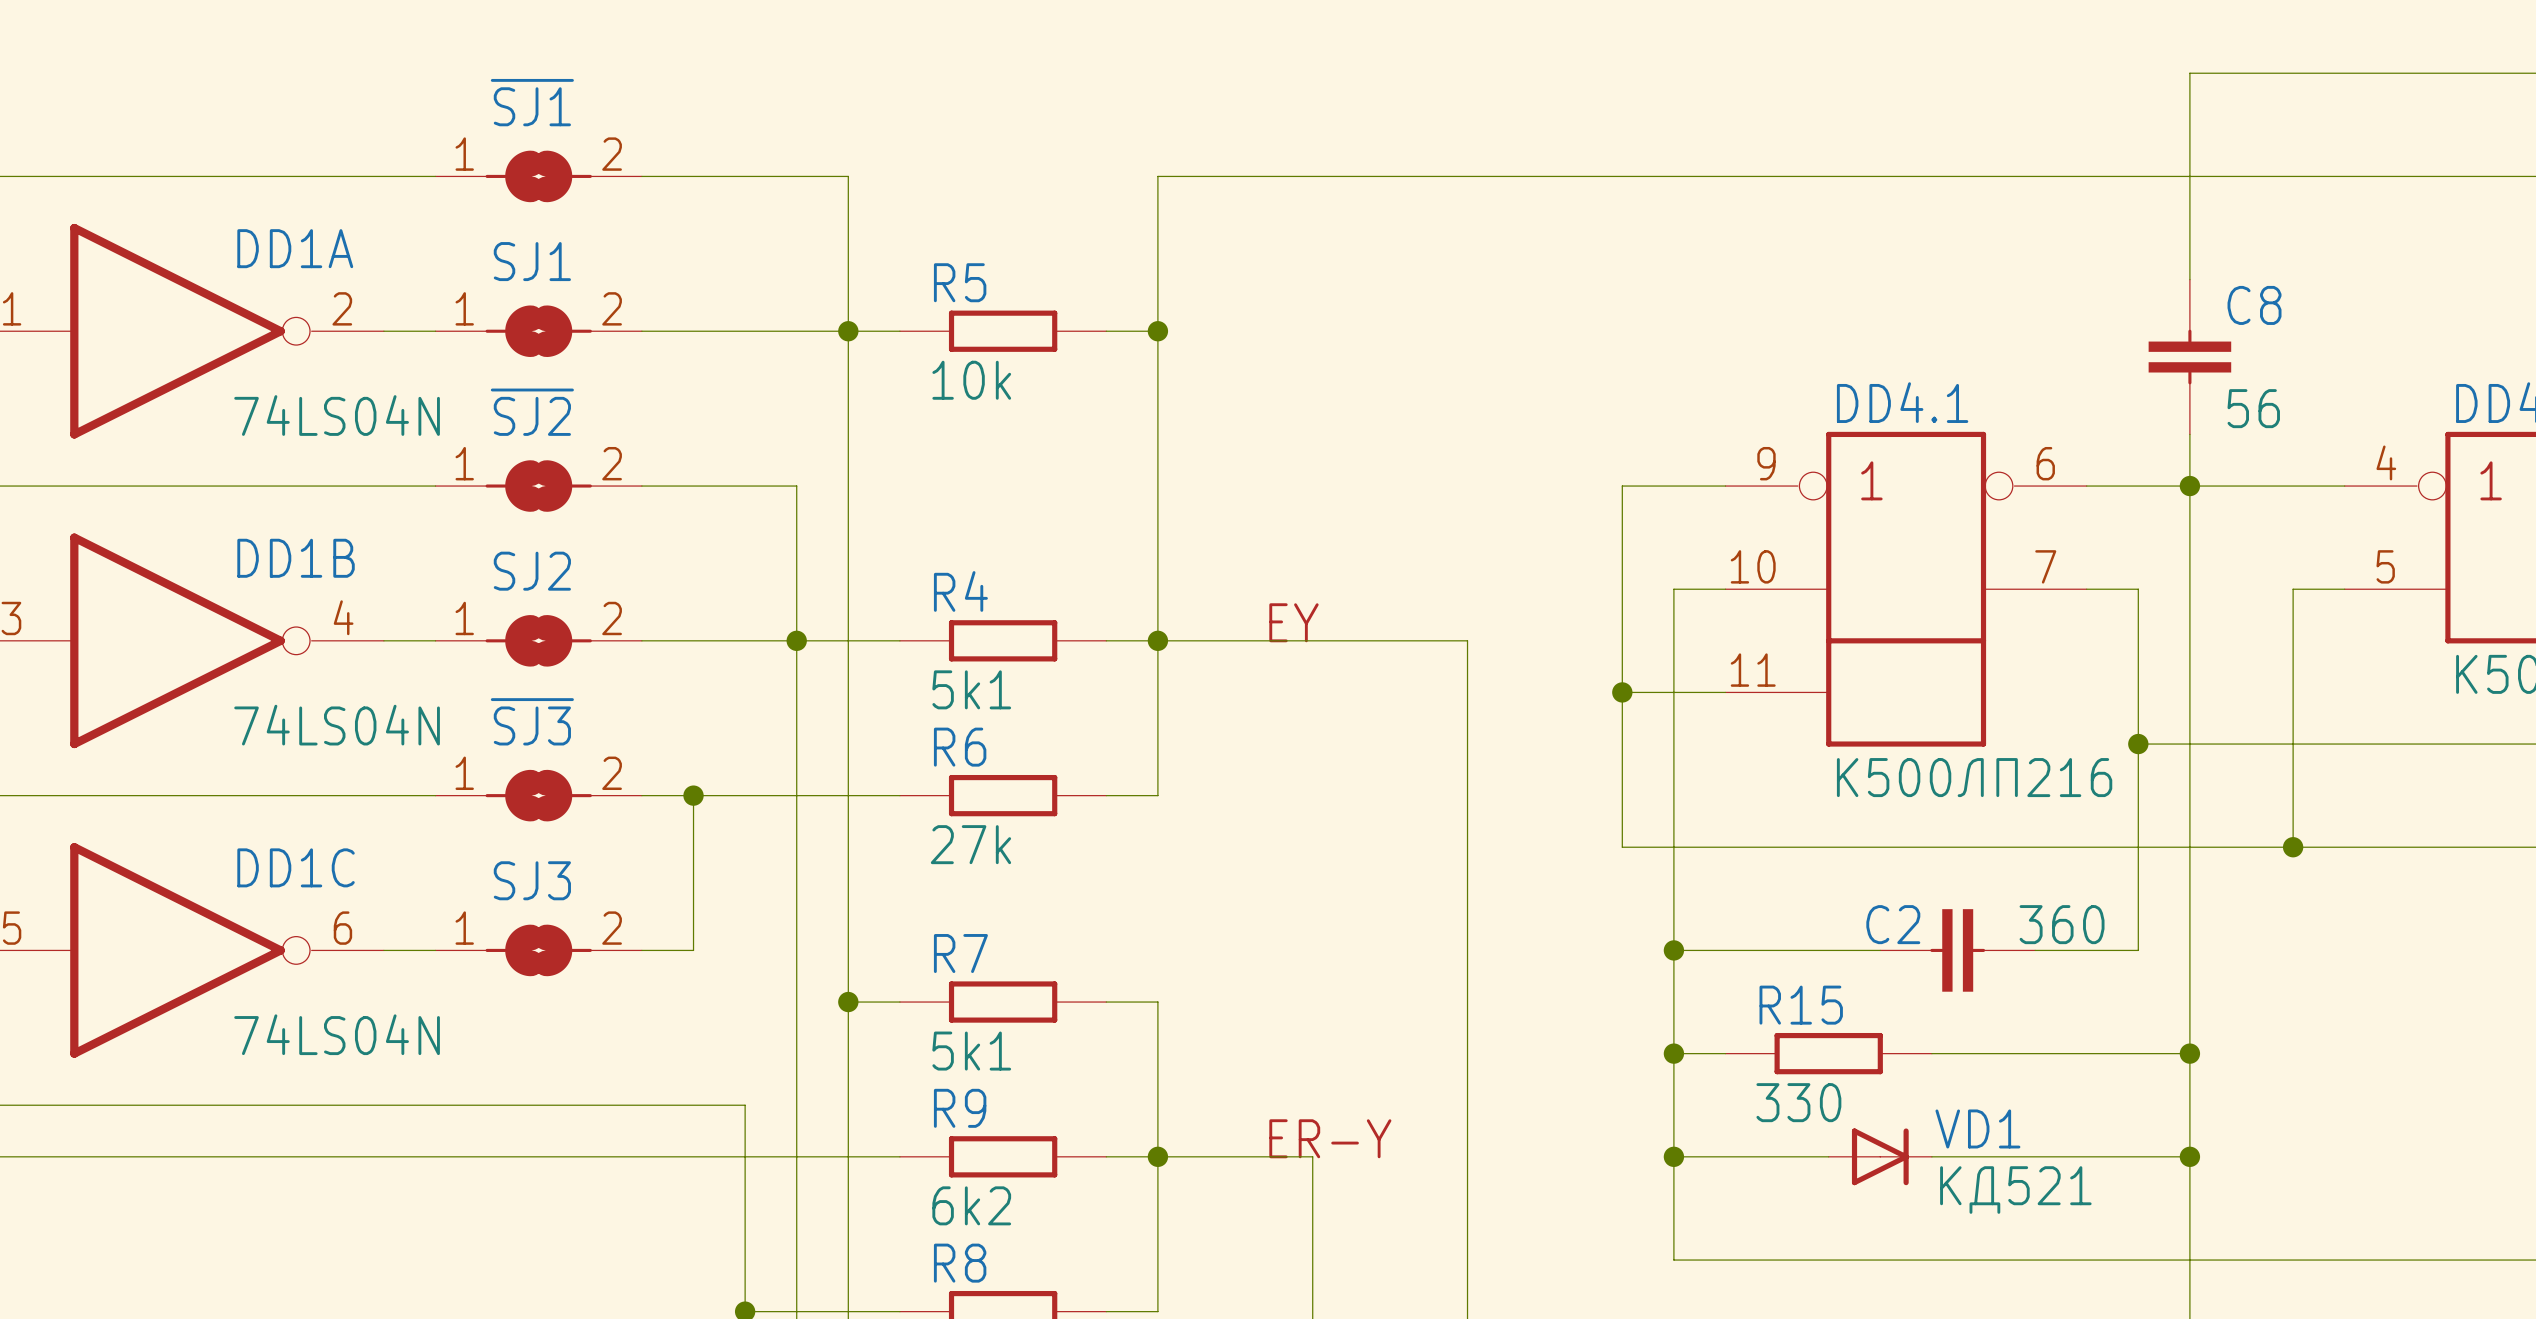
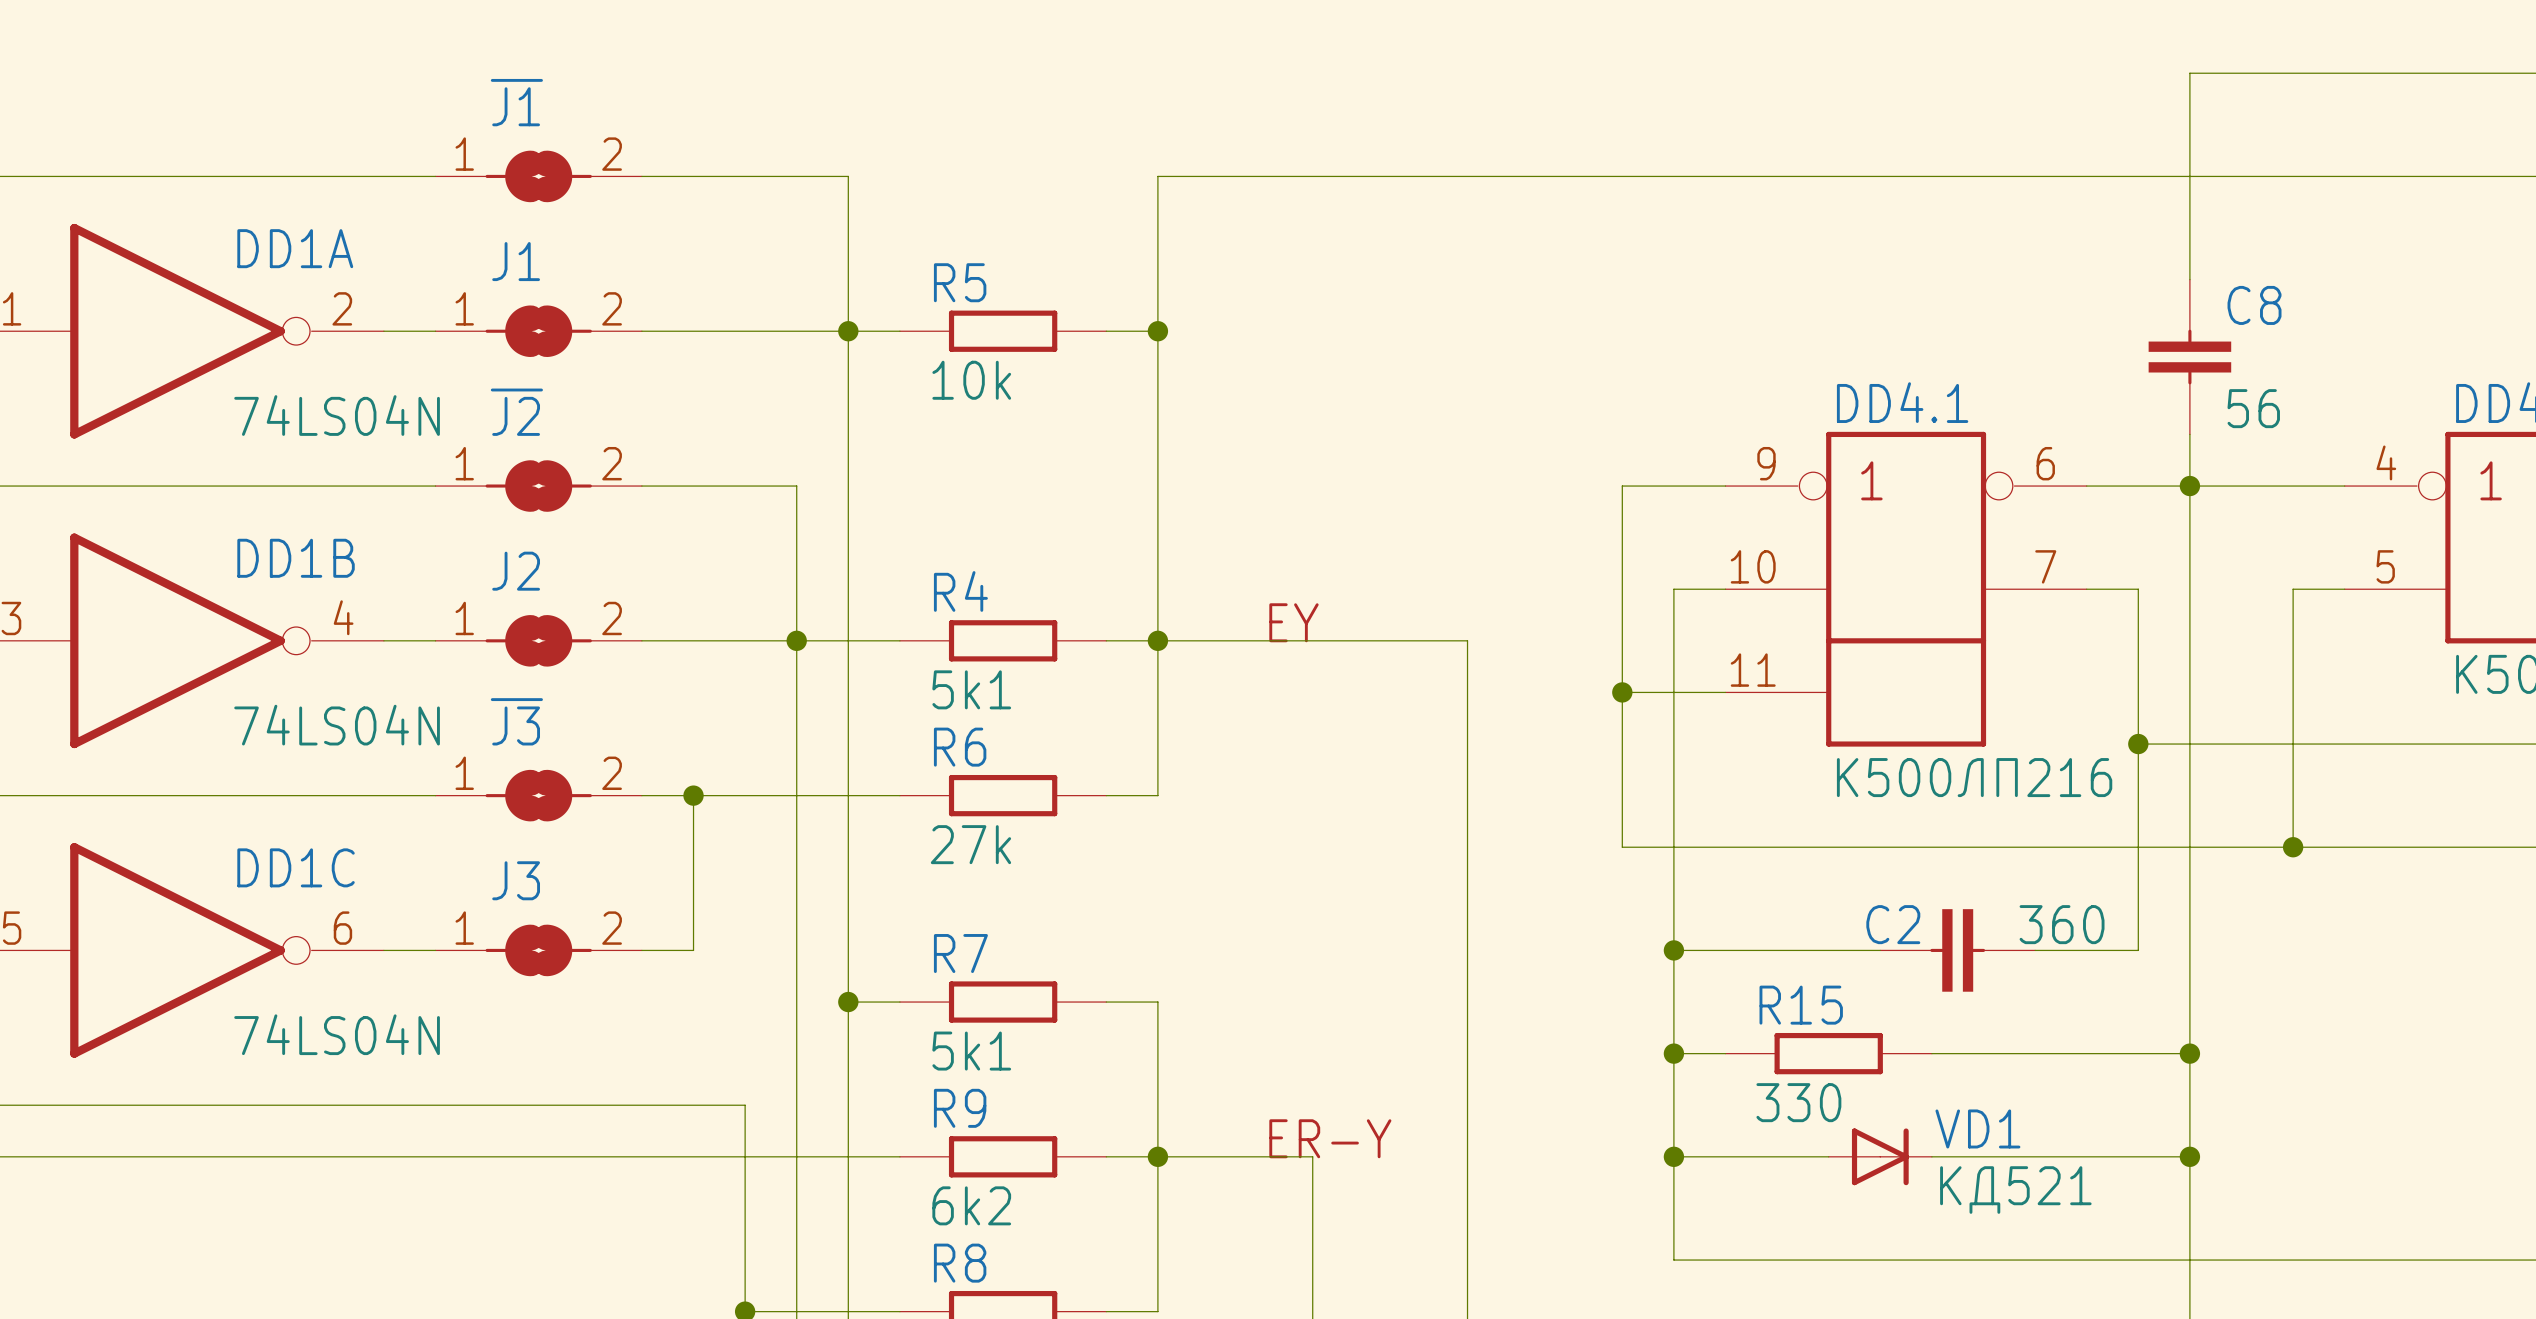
~{SJ1} name: ~{SJ1} (532, 102) -> ~{J1} (516, 102)
SJ1 name: SJ1 (532, 261) -> J1 (516, 261)
~{SJ2} name: ~{SJ2} (532, 412) -> ~{J2} (516, 412)
SJ2 name: SJ2 (532, 571) -> J2 (516, 571)
~{SJ3} name: ~{SJ3} (532, 721) -> ~{J3} (516, 721)
SJ3 name: SJ3 (532, 880) -> J3 (516, 880)

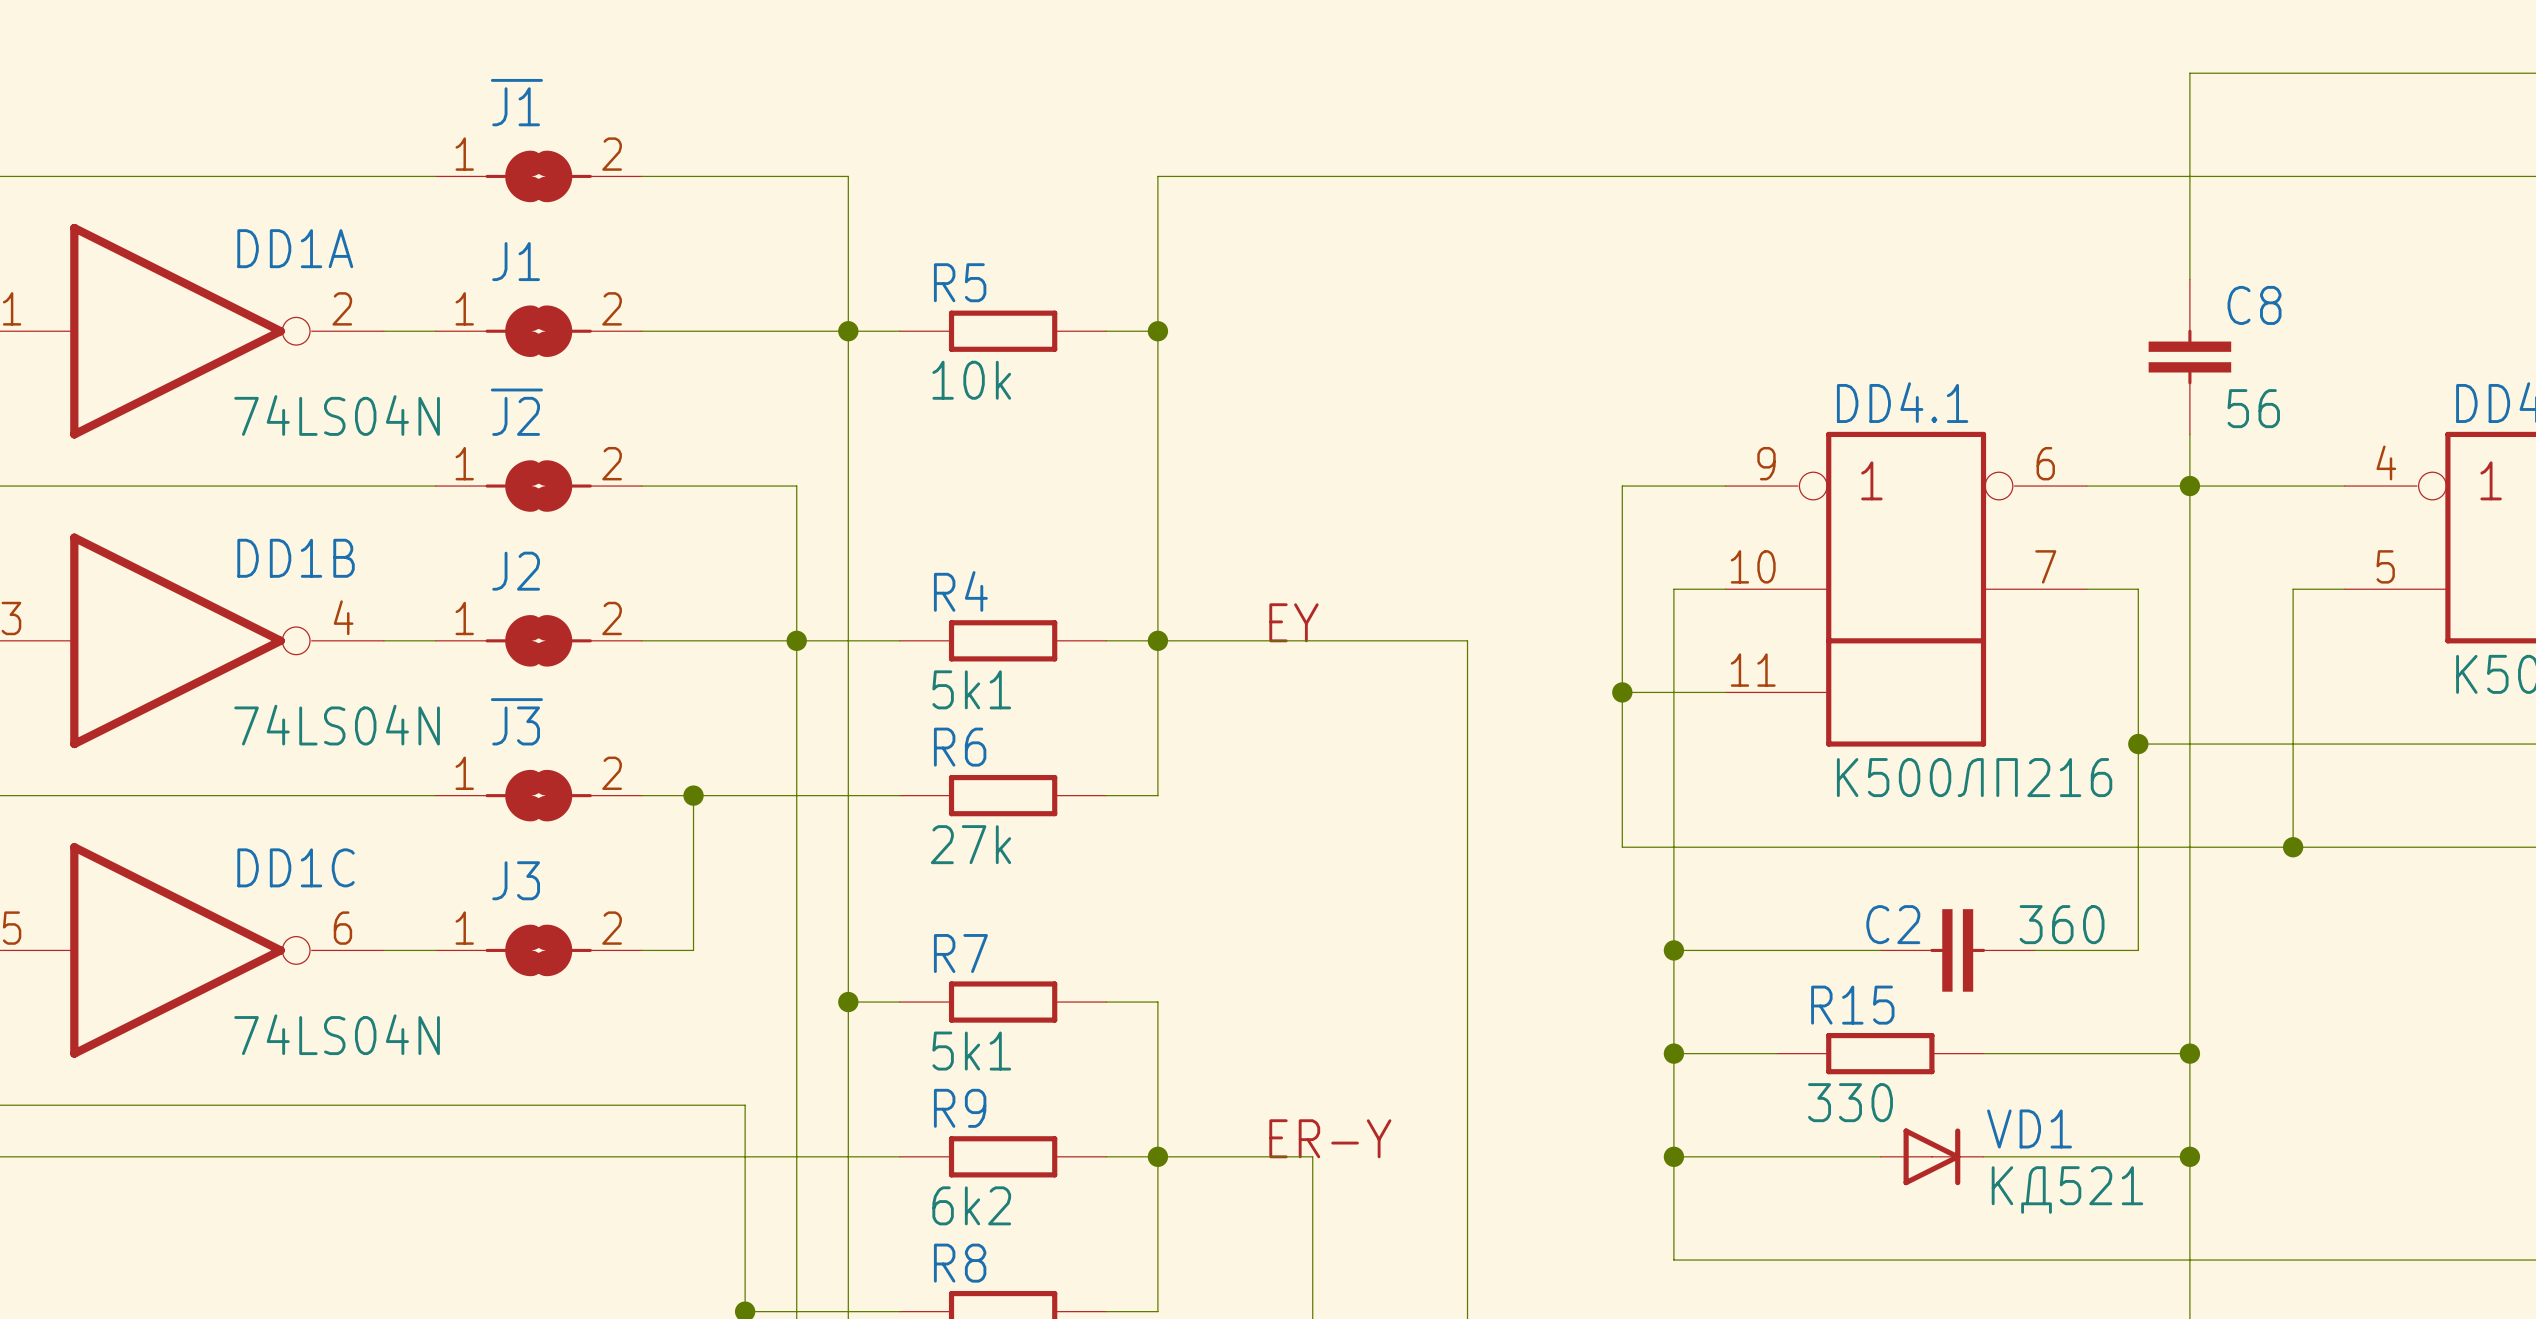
R15 position: (1828, 1053) -> (1880, 1053)
VD1 position: (1880, 1156) -> (1931, 1156)

